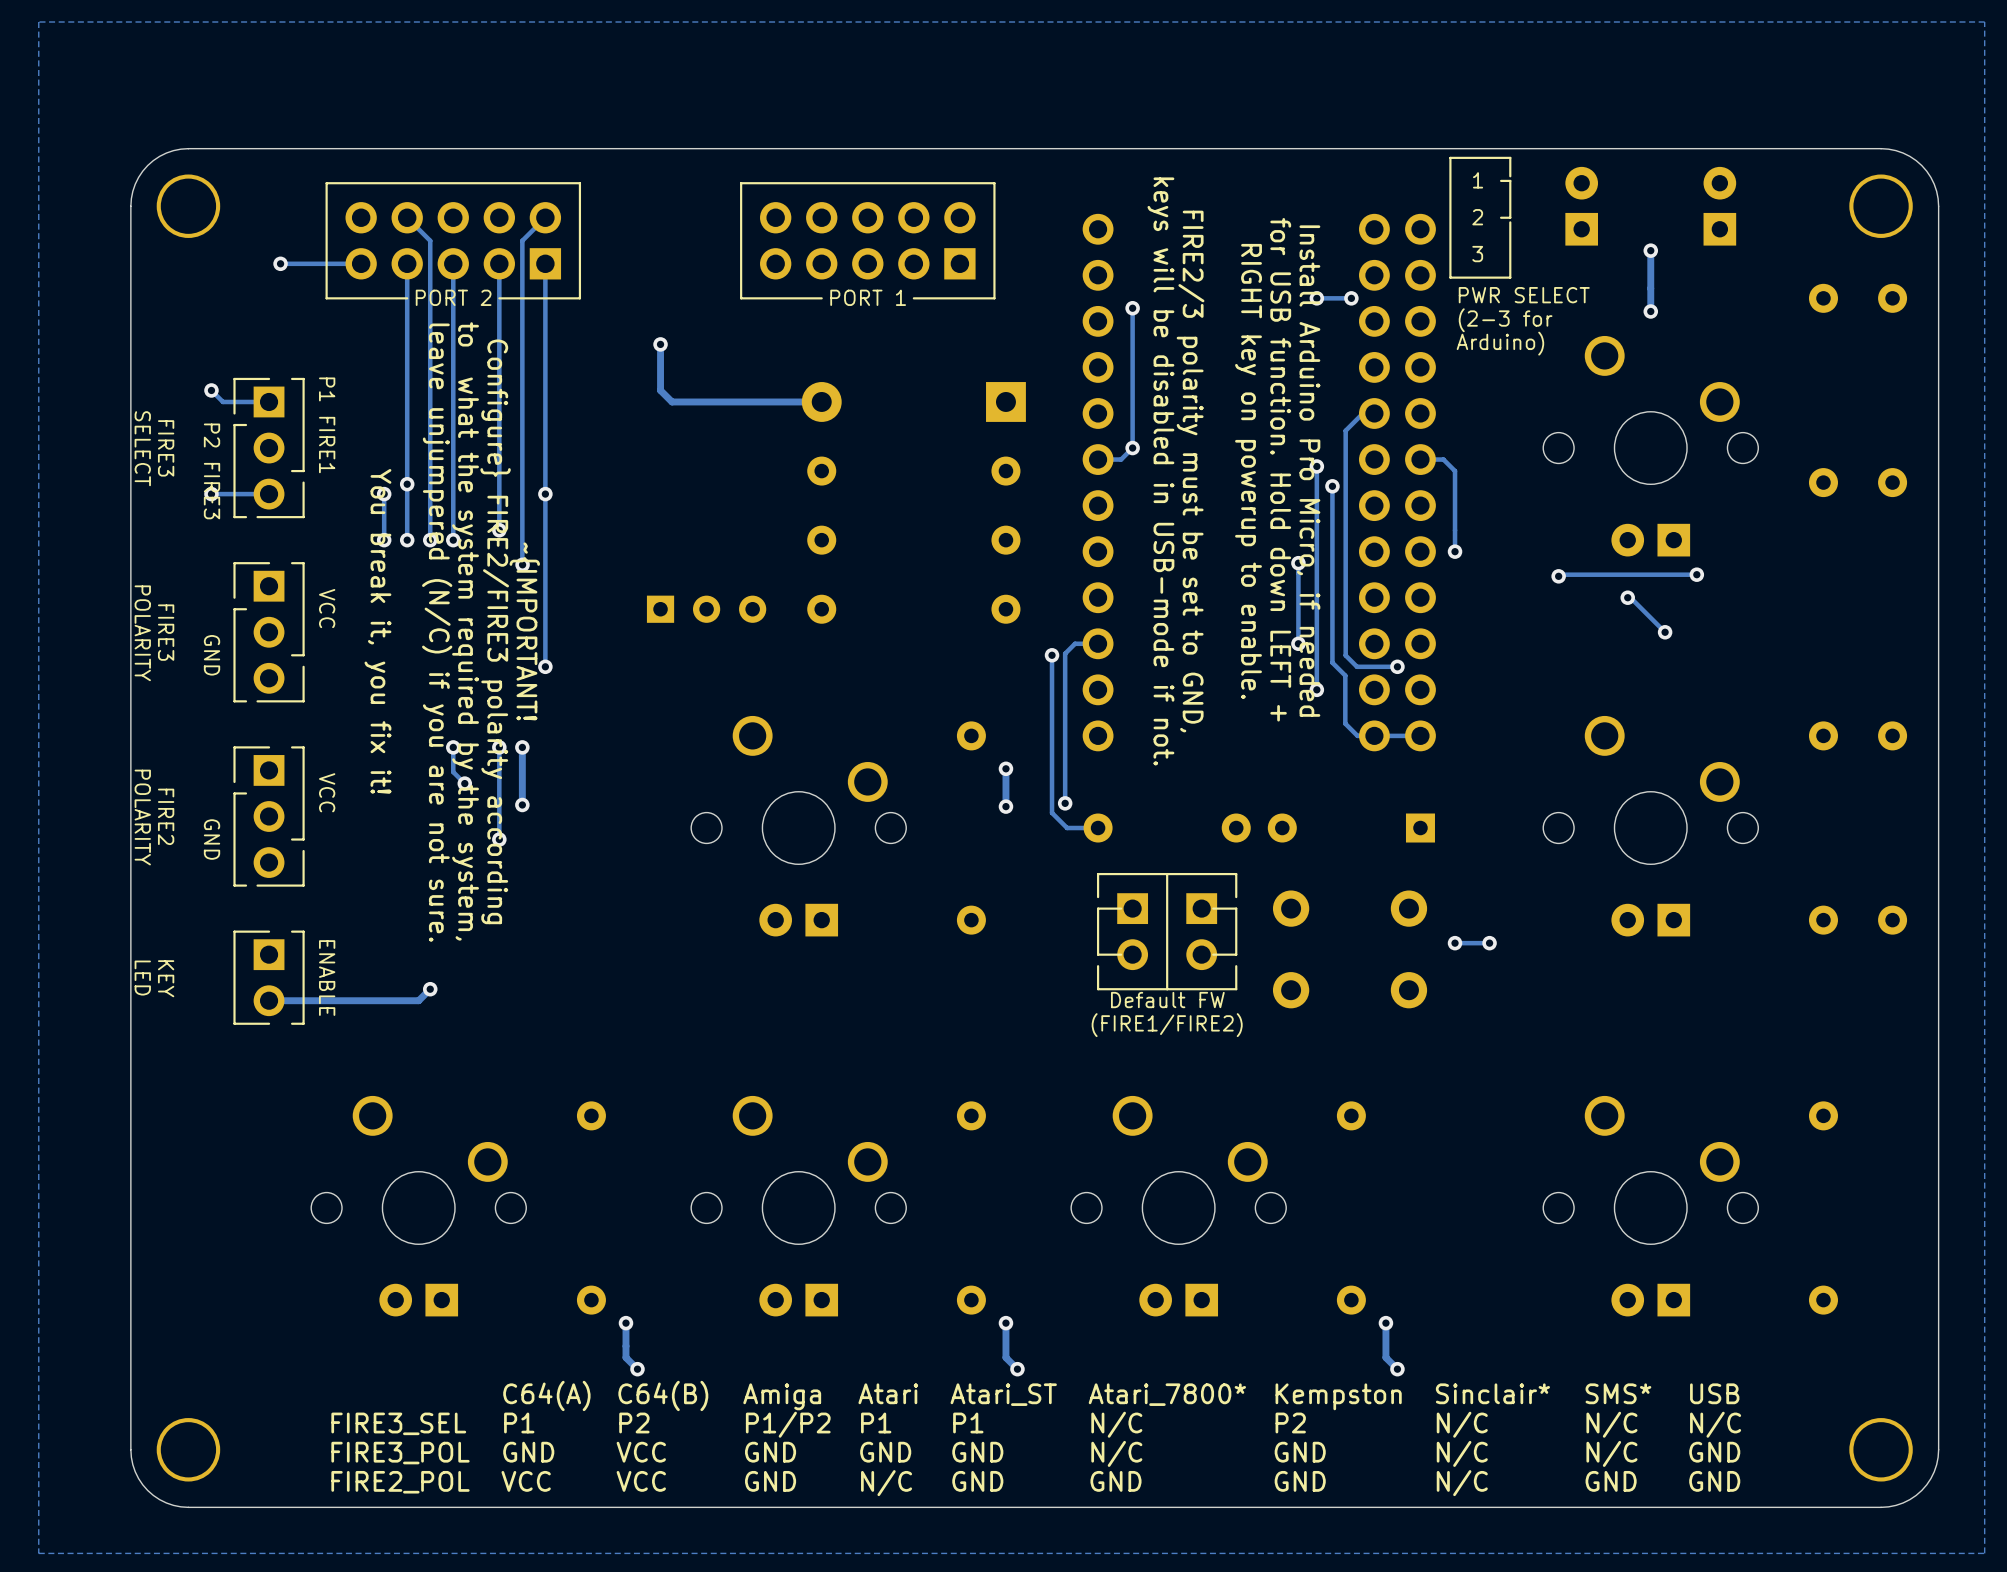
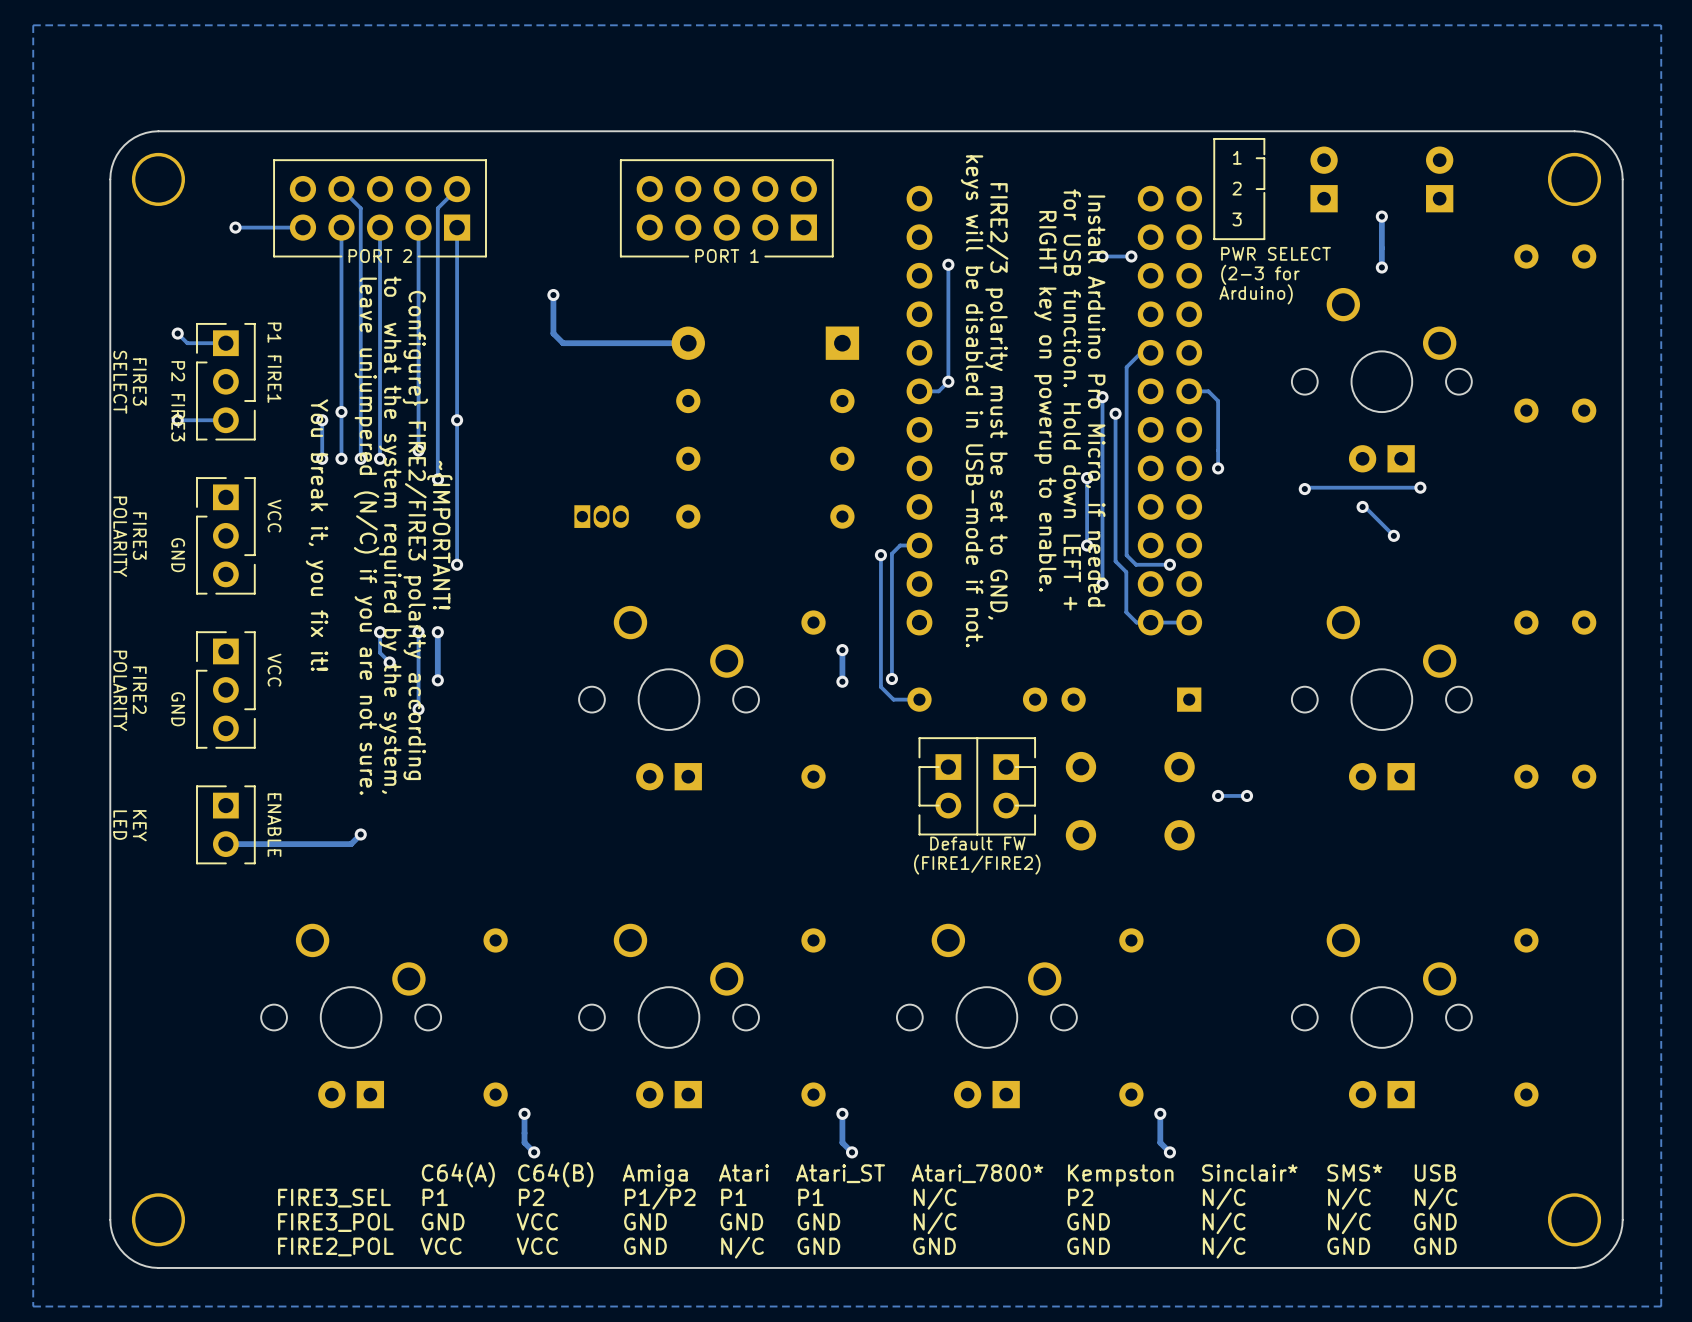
part footprint: [646, 595, 767, 623] -> [574, 505, 629, 528]

